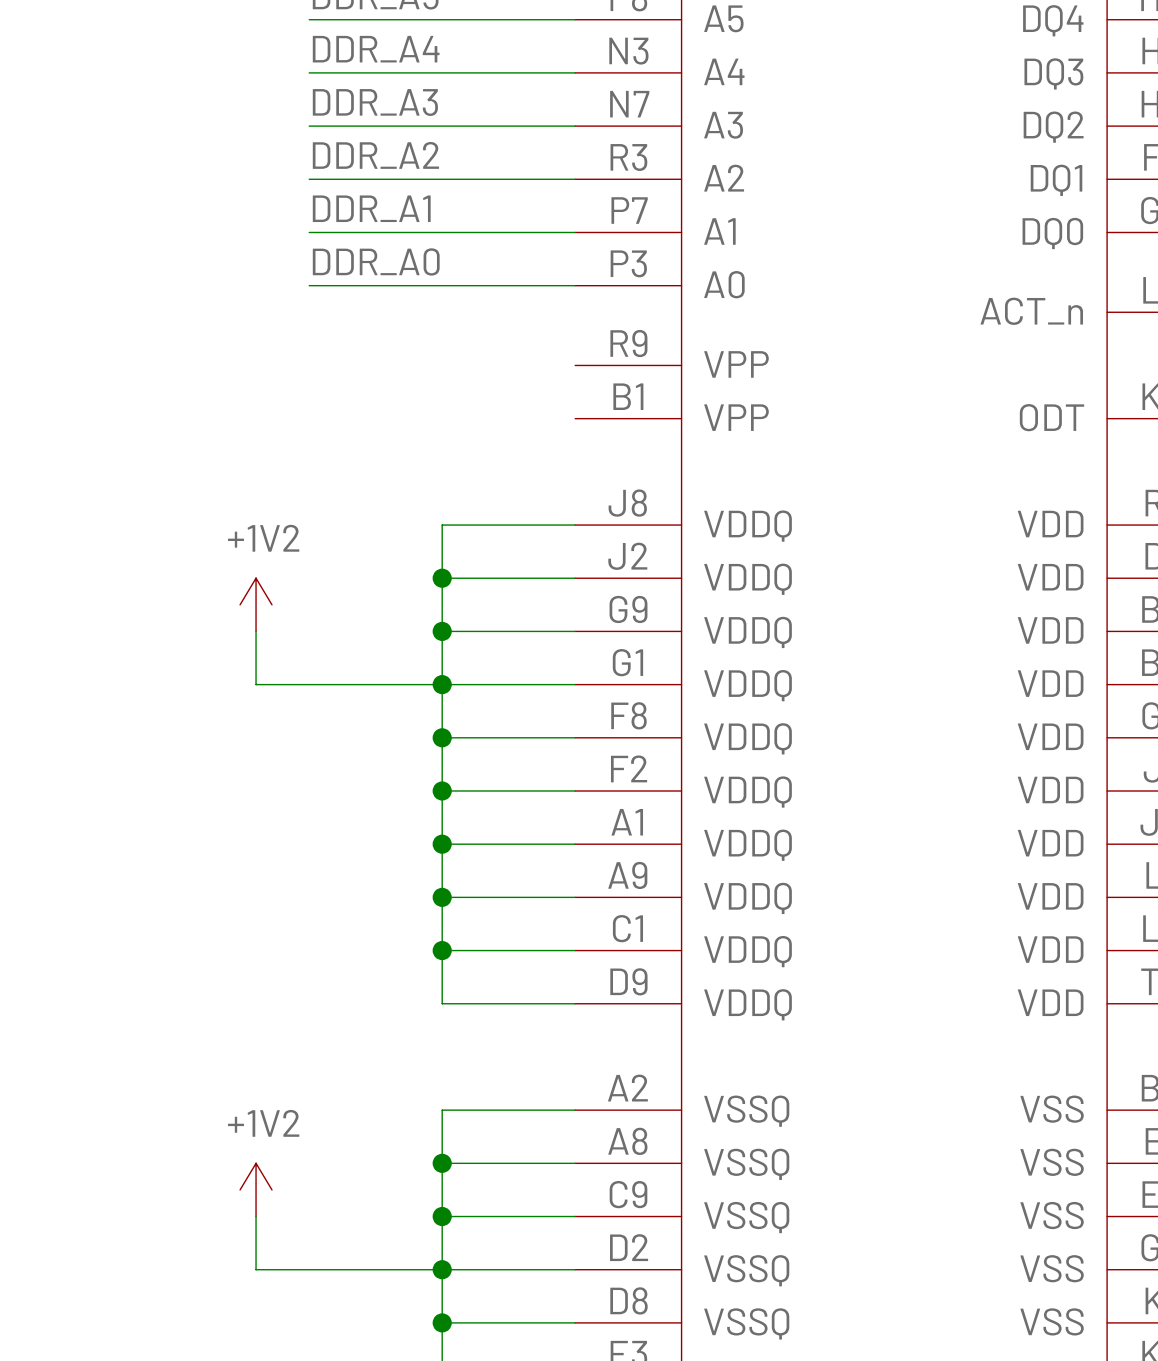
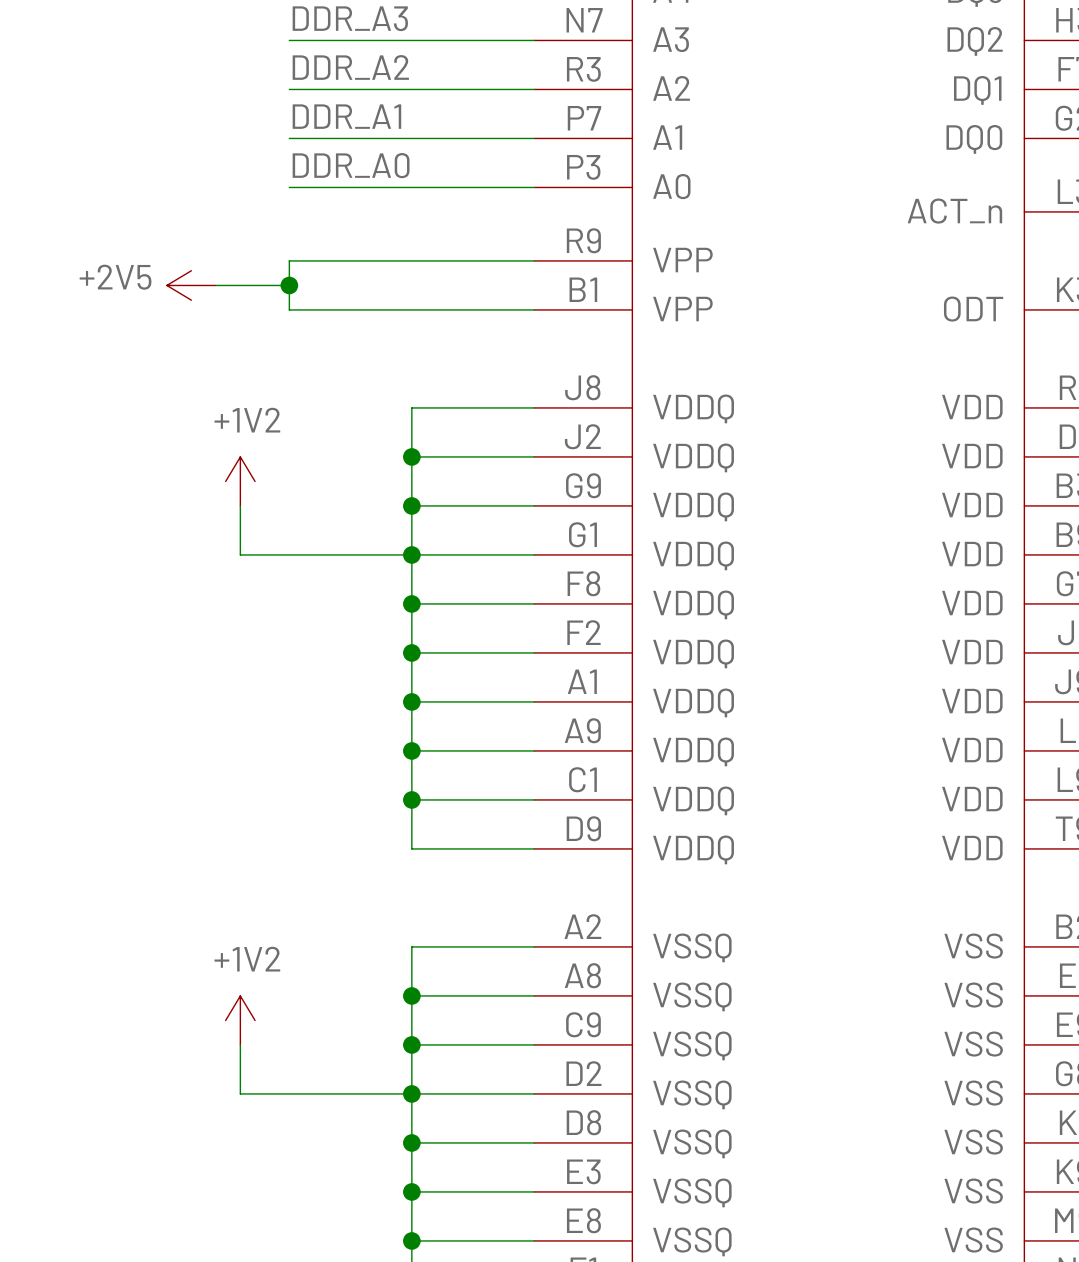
wire: none -> (534, 260) (289, 260) (289, 309) (534, 309)
power symbol: none -> +2V5 (191, 285)
wire: none -> (215, 285) (289, 285)
junction: none -> (289, 285)

